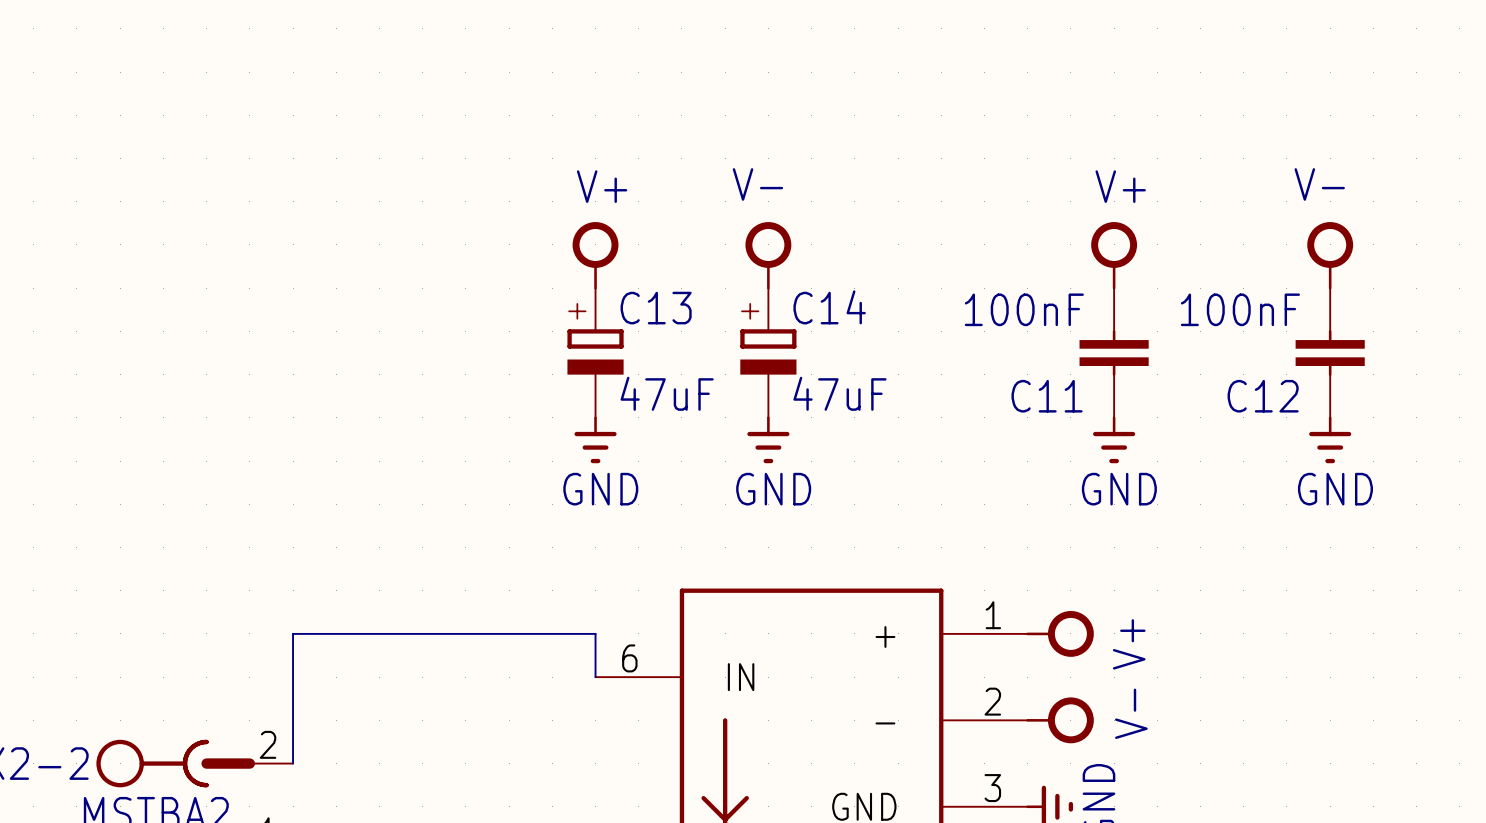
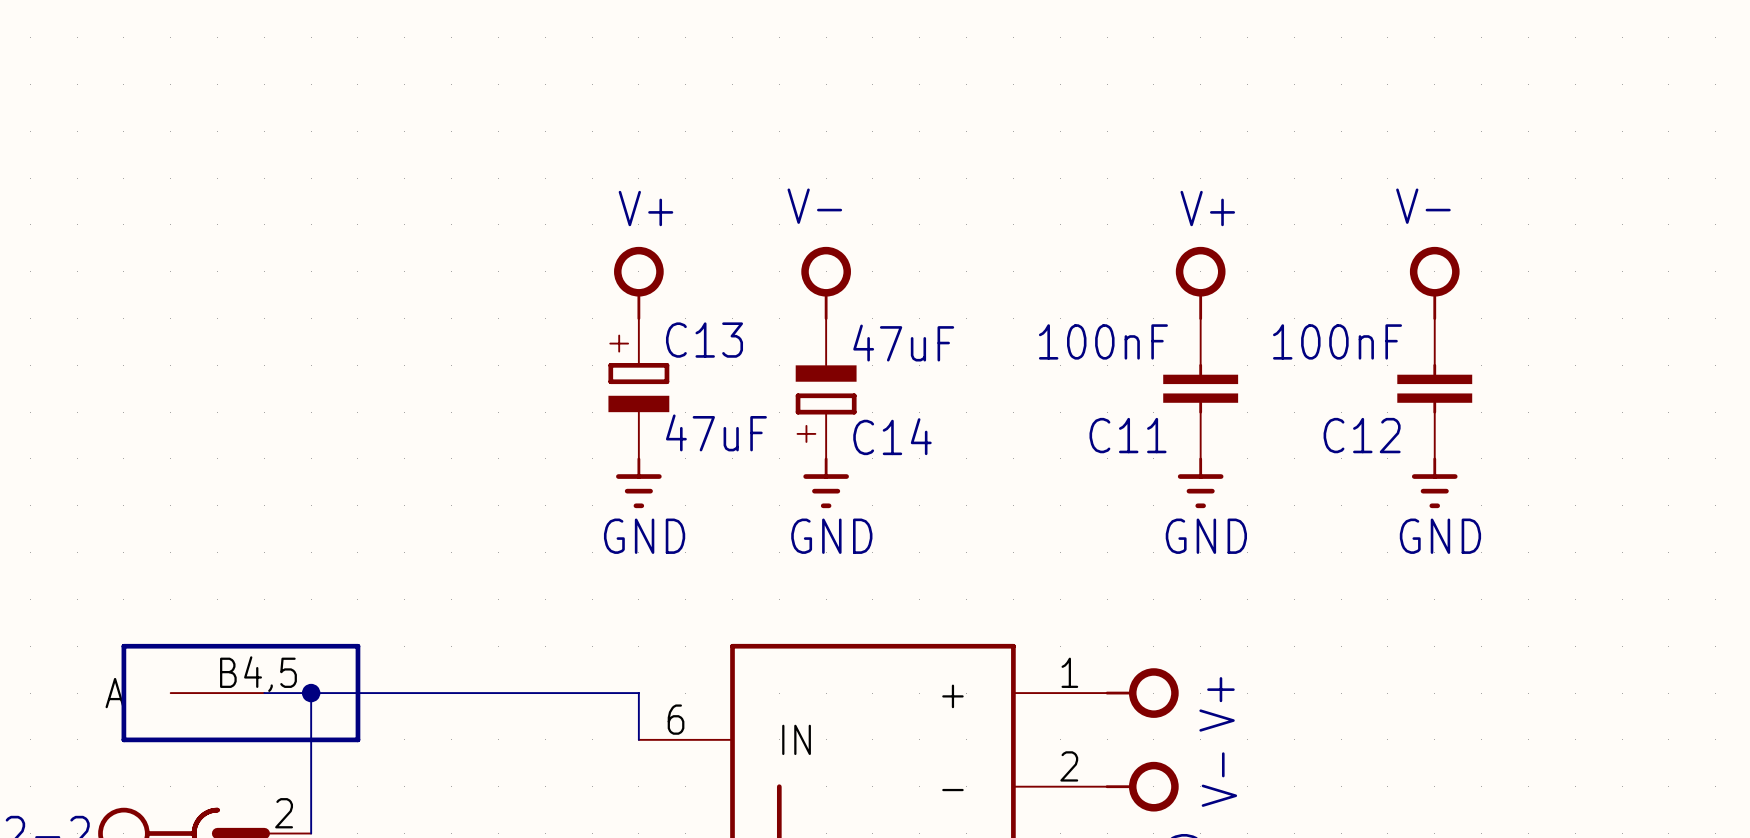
C14 flip: as is (768, 351) -> up-down (826, 389)
part: none -> (240, 693)
wire: none -> (264, 693) (311, 693)
junction: none -> (311, 693)

